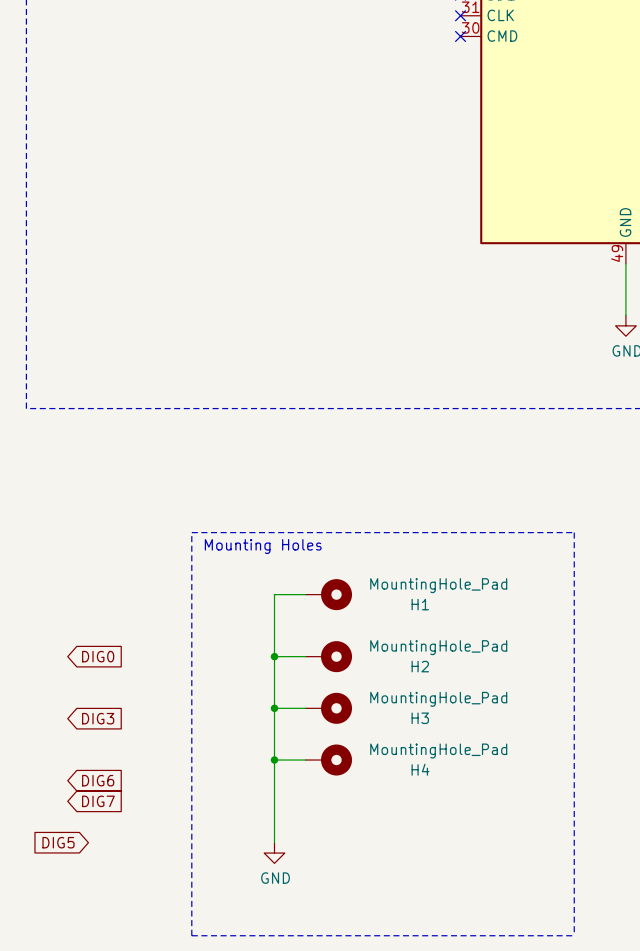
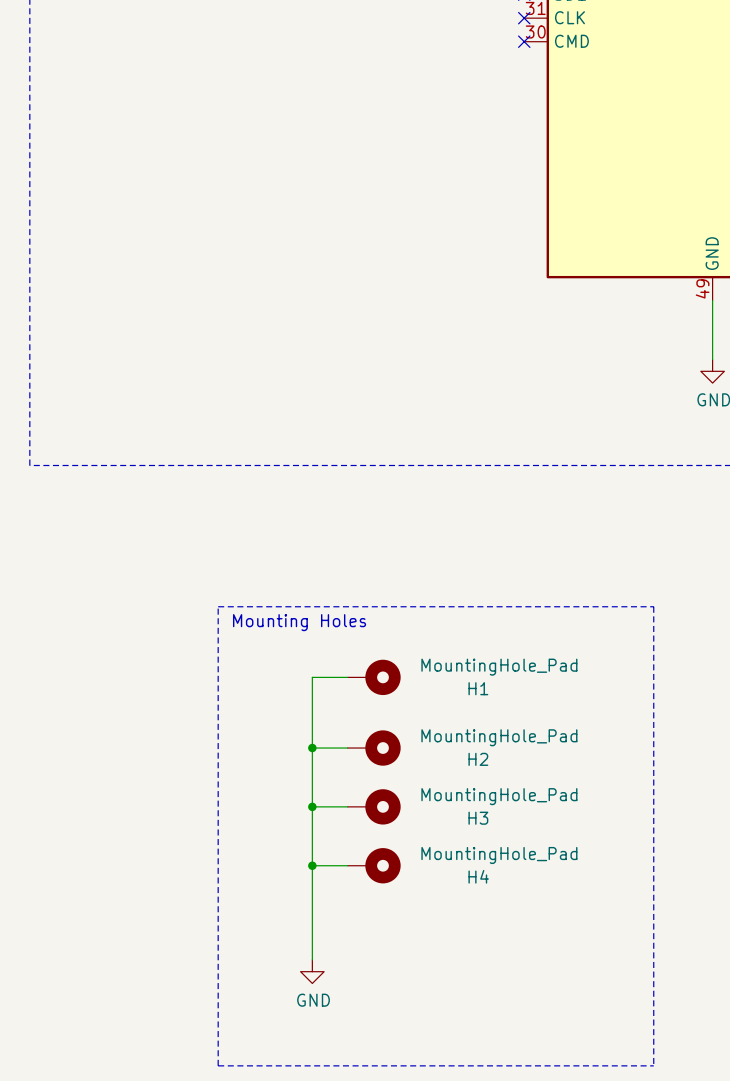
global label: DIG0 (98, 656) -> none
global label: DIG3 (98, 718) -> none
global label: DIG6 (98, 780) -> none
global label: DIG7 (98, 801) -> none
global label: DIG5 (58, 842) -> none

